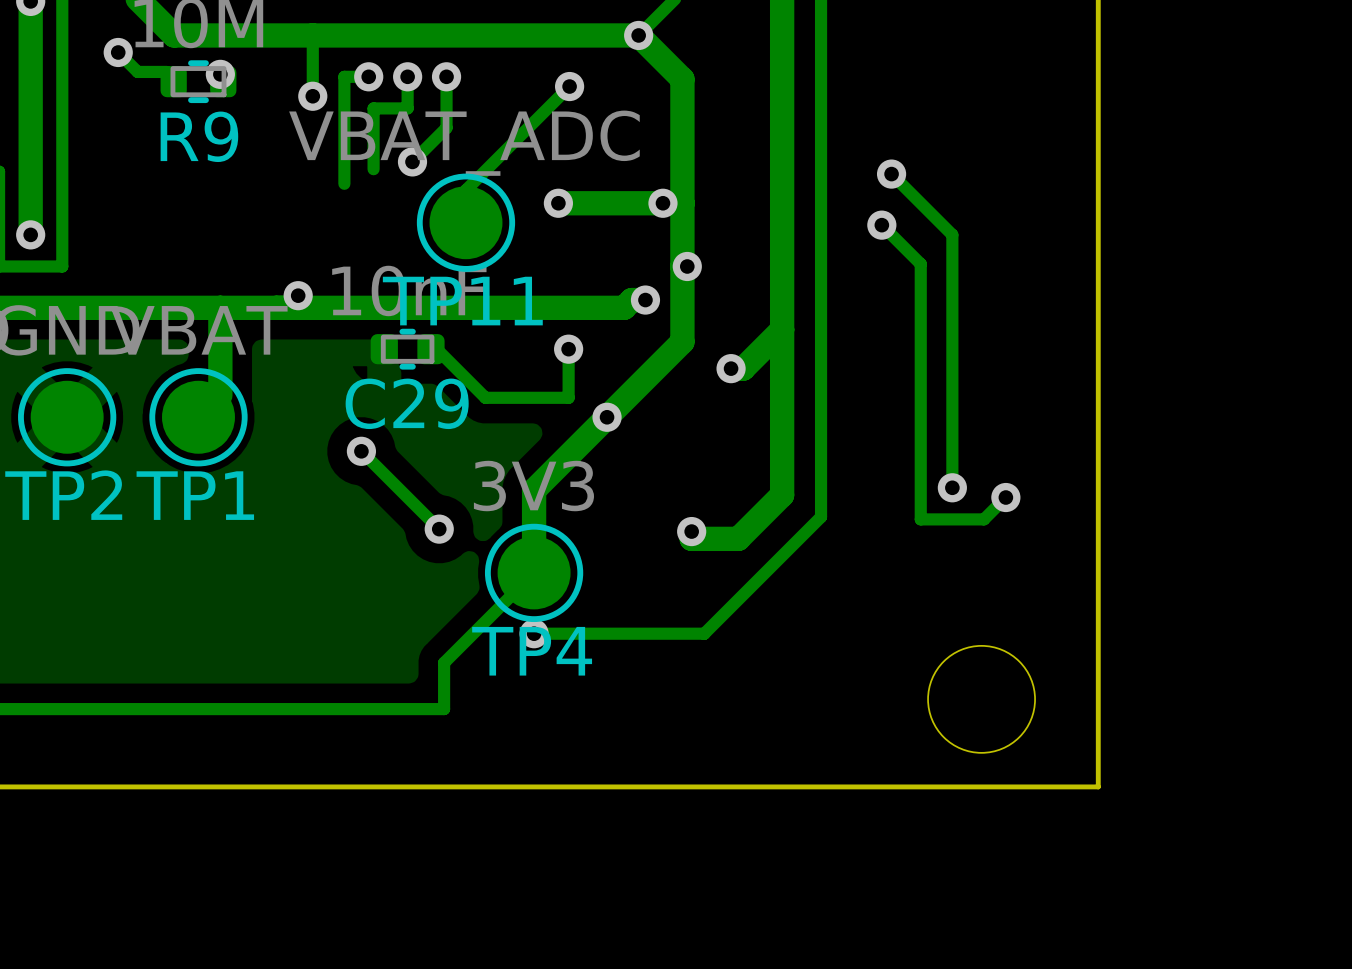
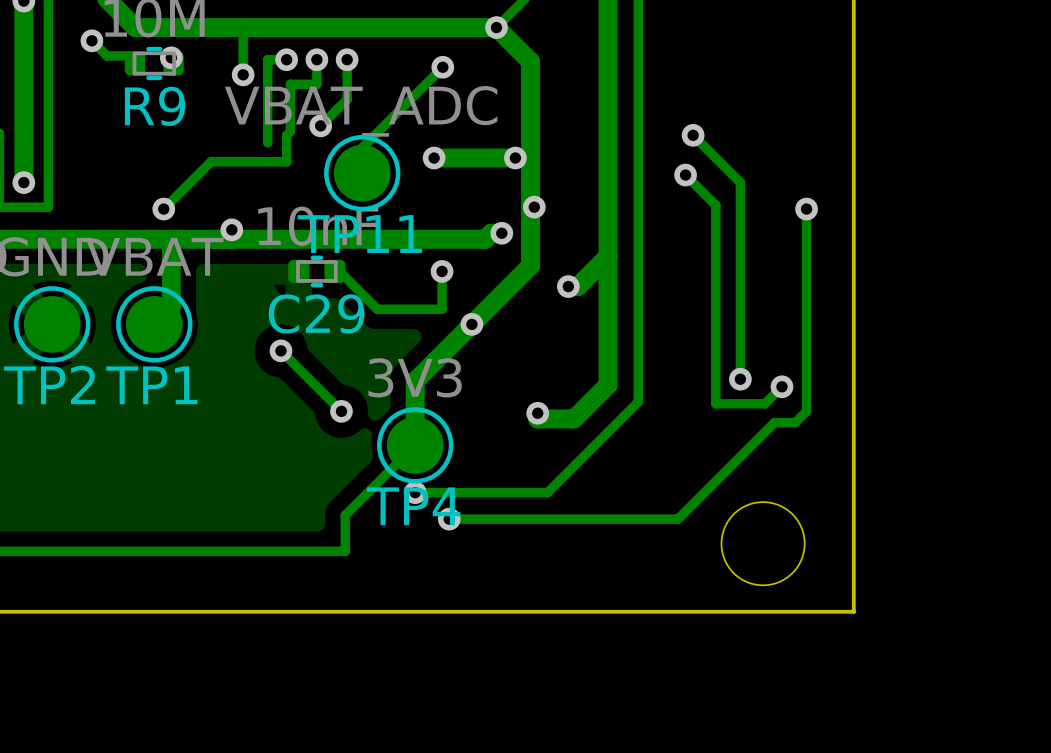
track: none -> (290, 131) (286, 135) (286, 161) (211, 161) (163, 209)
via: none -> (163, 209)
track: none -> (806, 209) (806, 411) (795, 422) (774, 422) (678, 519) (449, 519)
via: none -> (806, 209)
via: none -> (449, 519)

